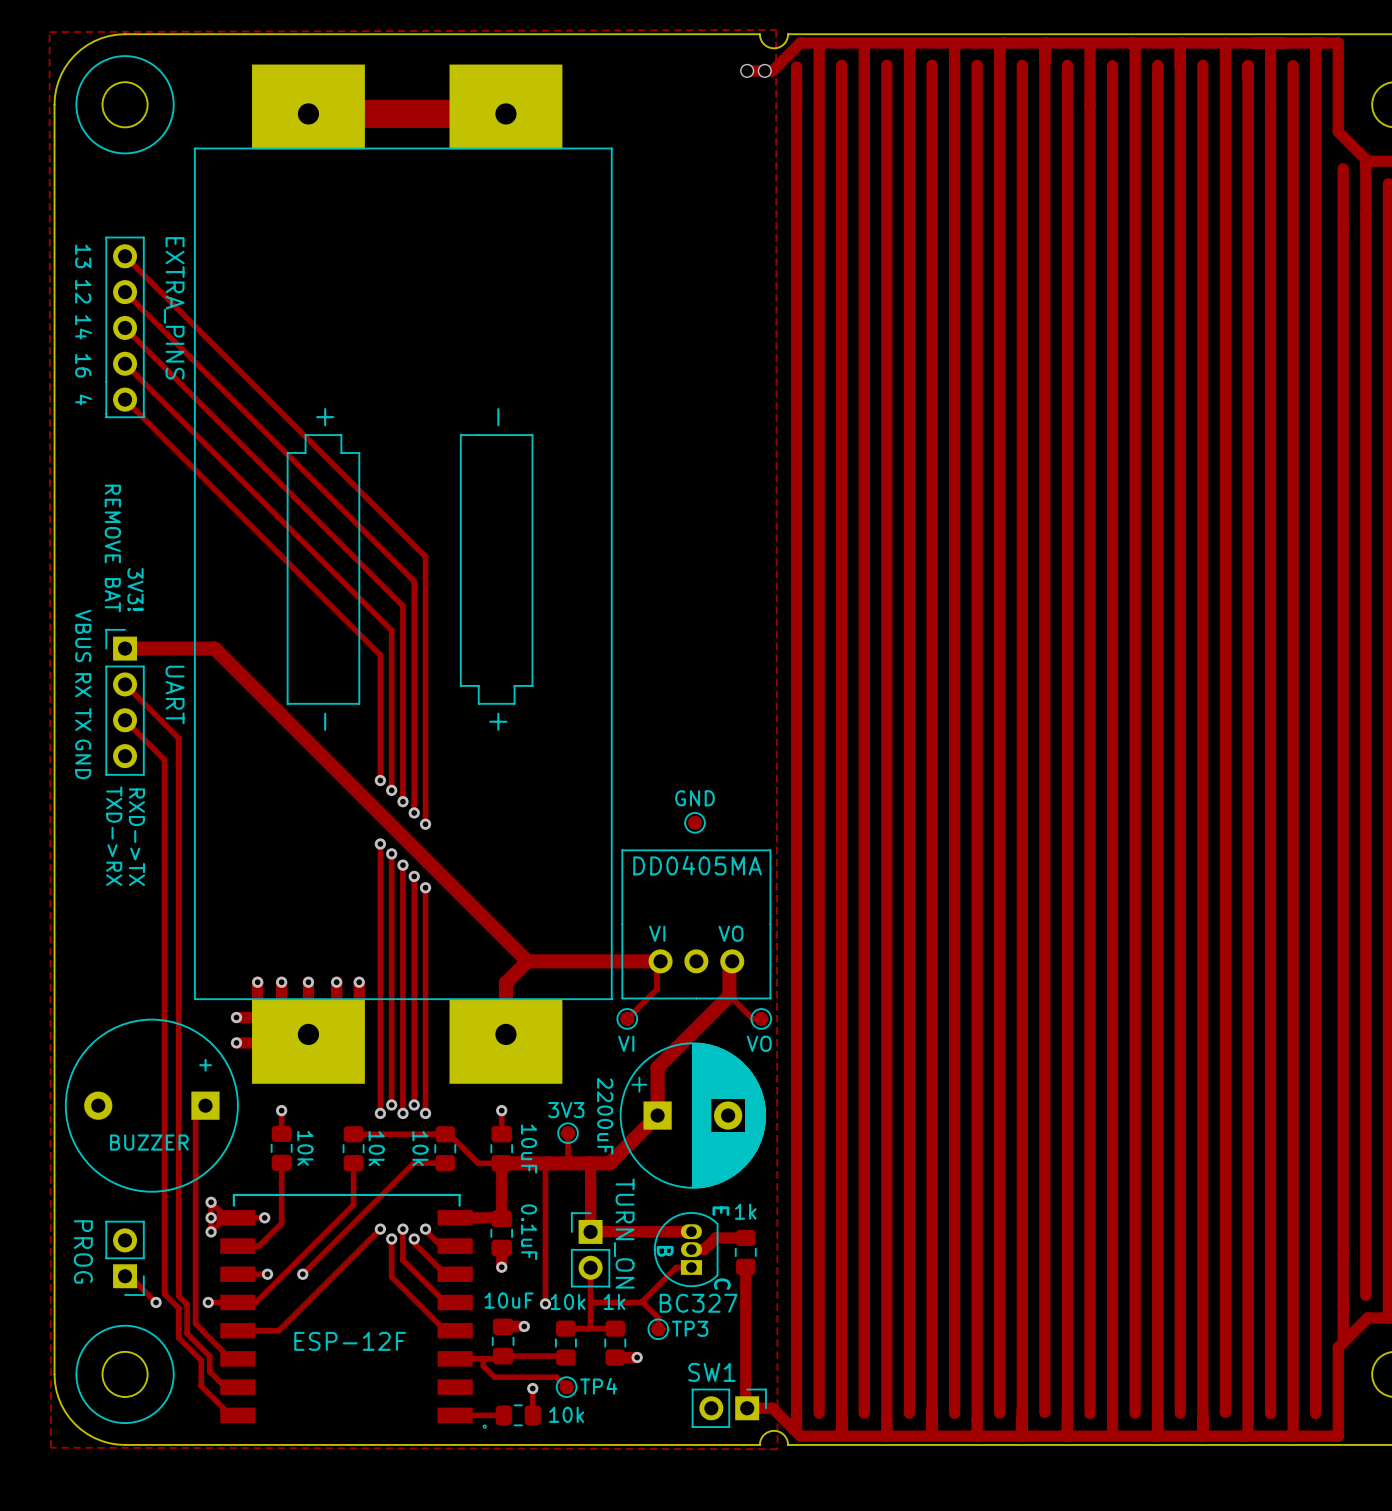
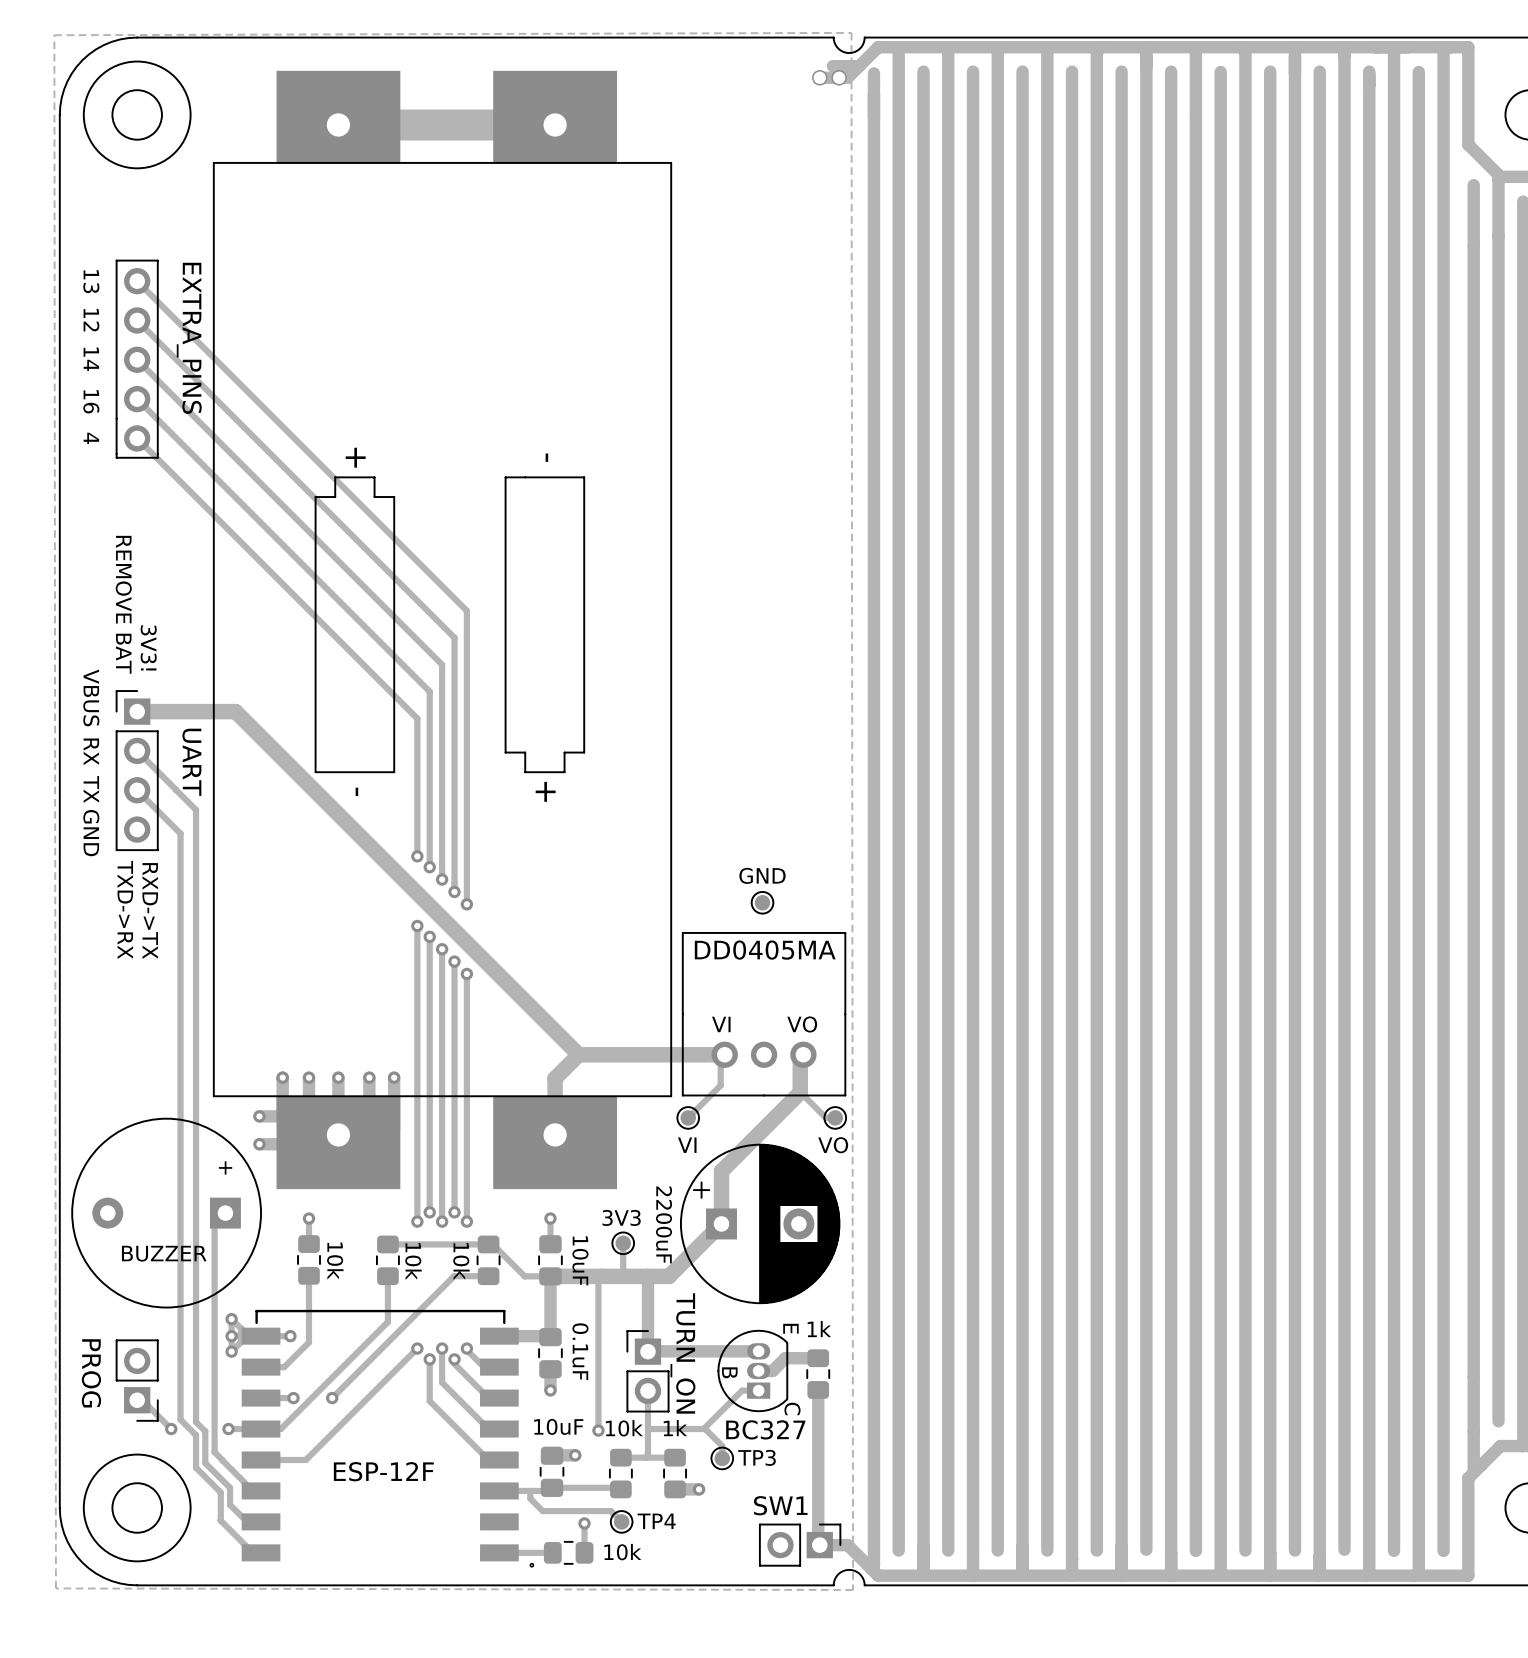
track: none -> (832, 66) (859, 66)

